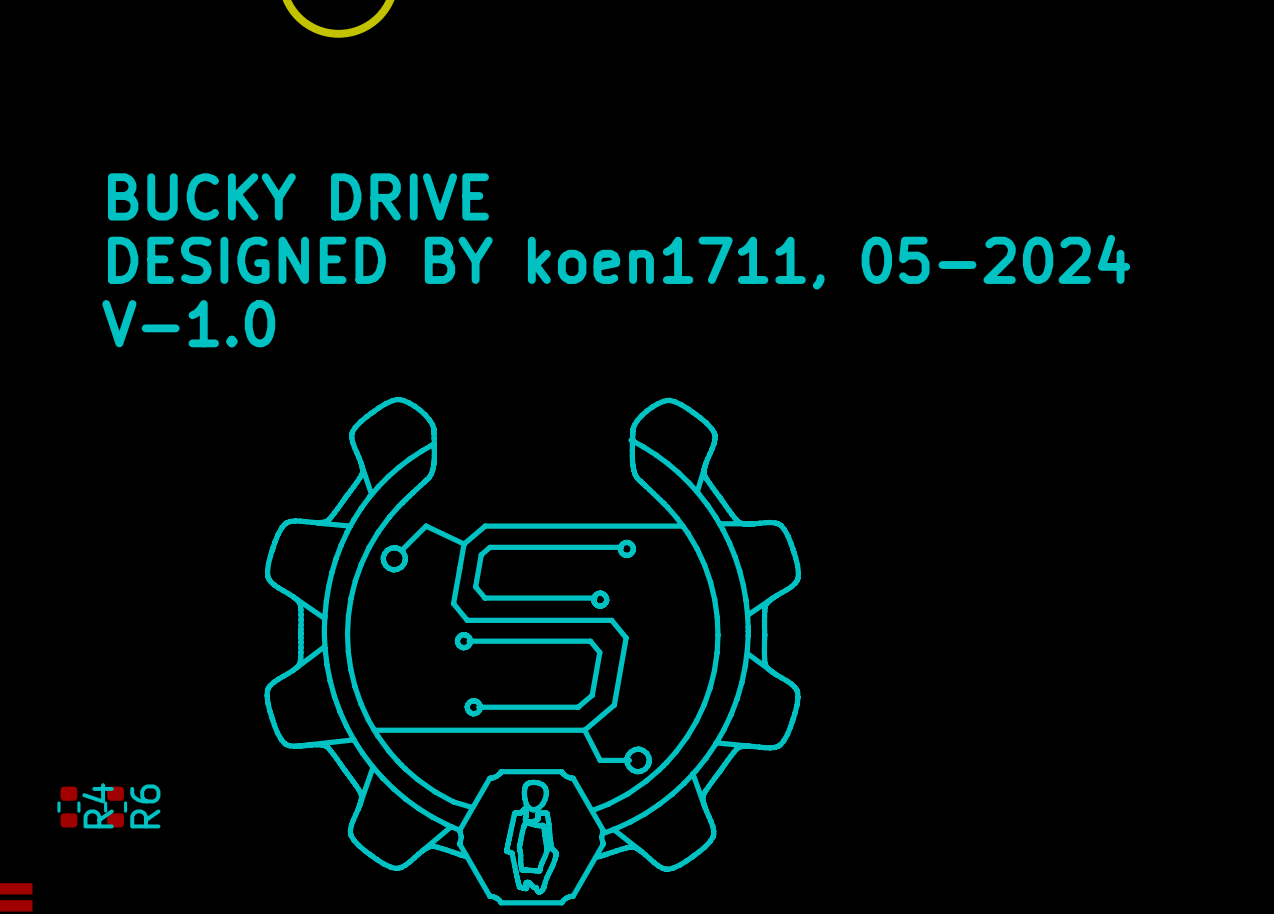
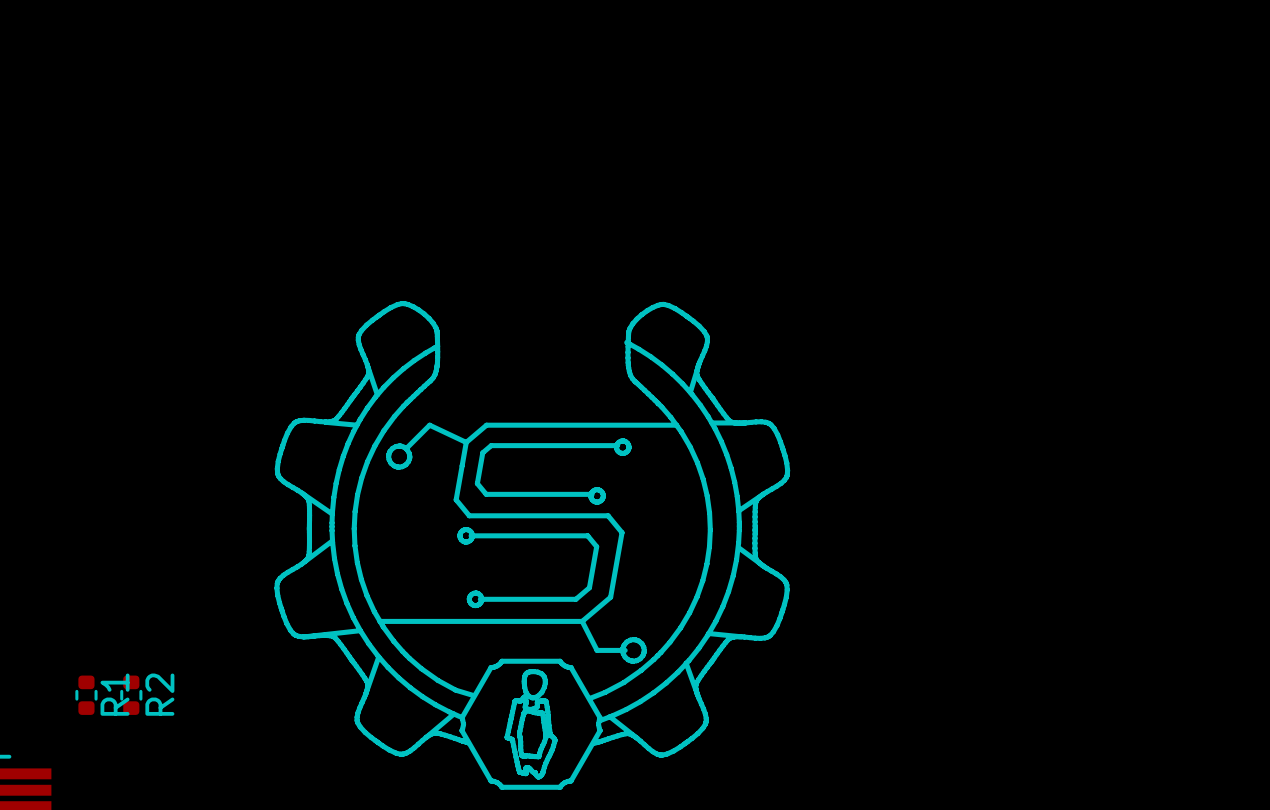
text: BUCKY DRIVE (298, 196) -> none
text: DESIGNED BY koen1711, 05-2024 (619, 262) -> none
text: V-1.0 (188, 323) -> none
R4 name: R4 (98, 805) -> R1 (115, 694)
R6 name: R6 (145, 806) -> R2 (159, 694)

